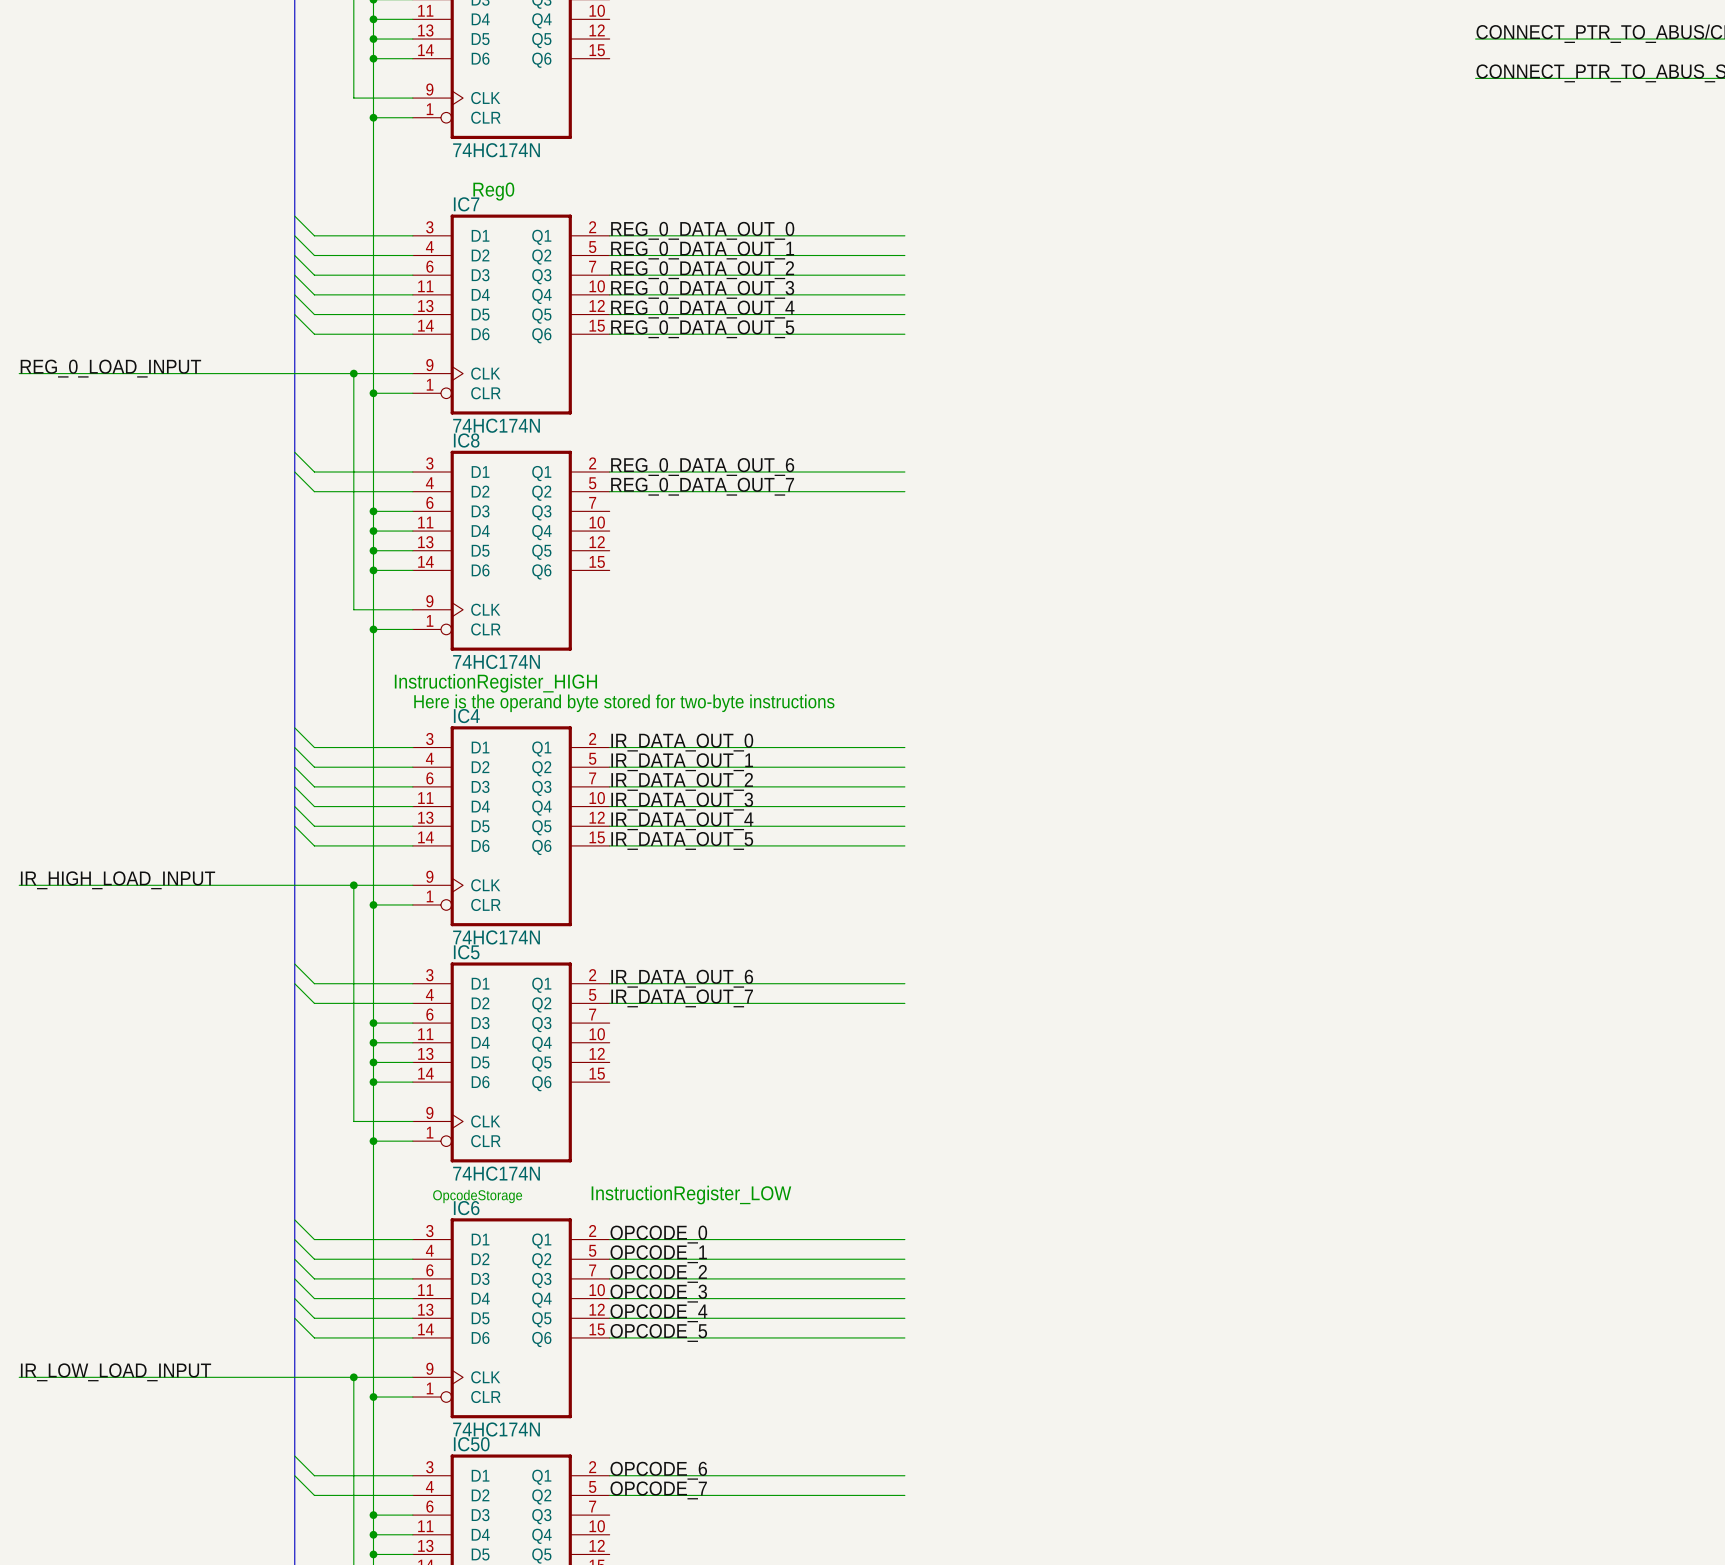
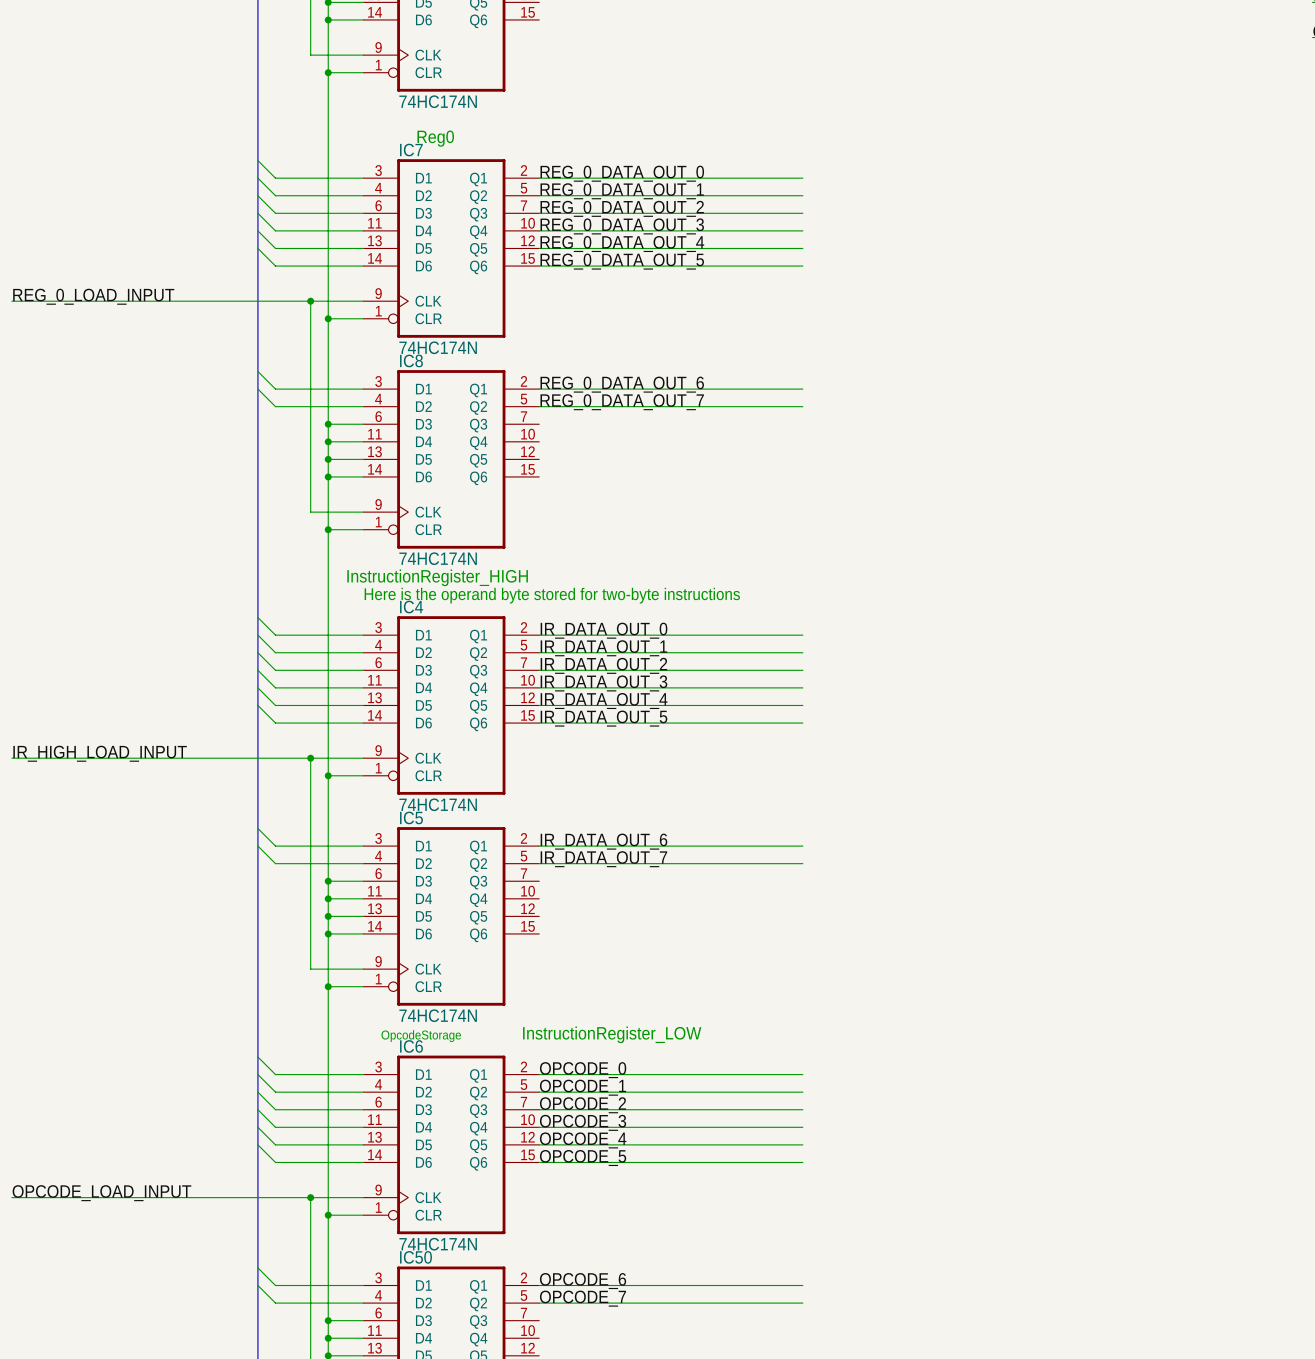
label: IR_LOW_LOAD_INPUT (116, 1372) -> OPCODE_LOAD_INPUT (101, 1193)

